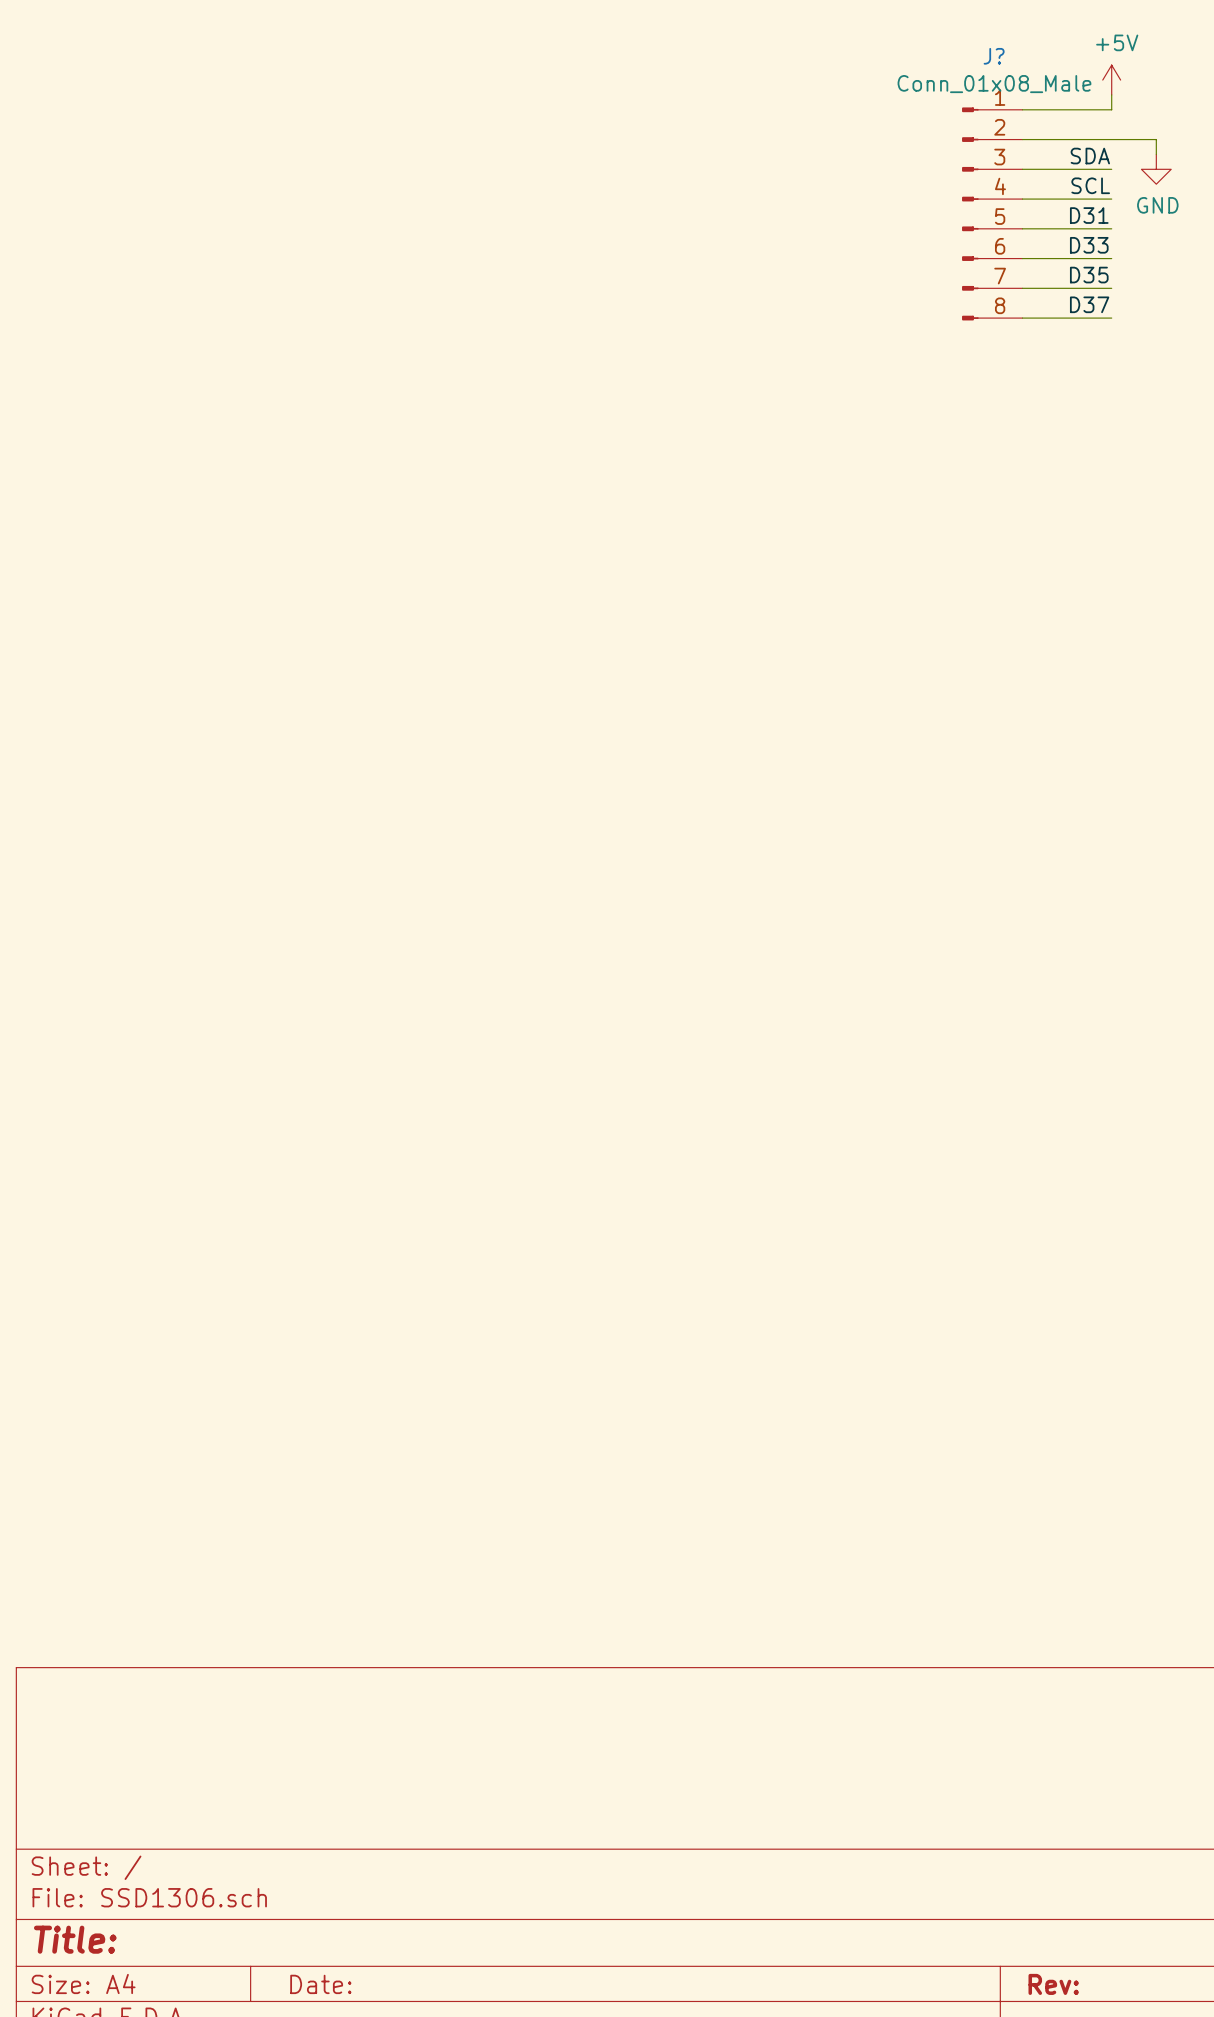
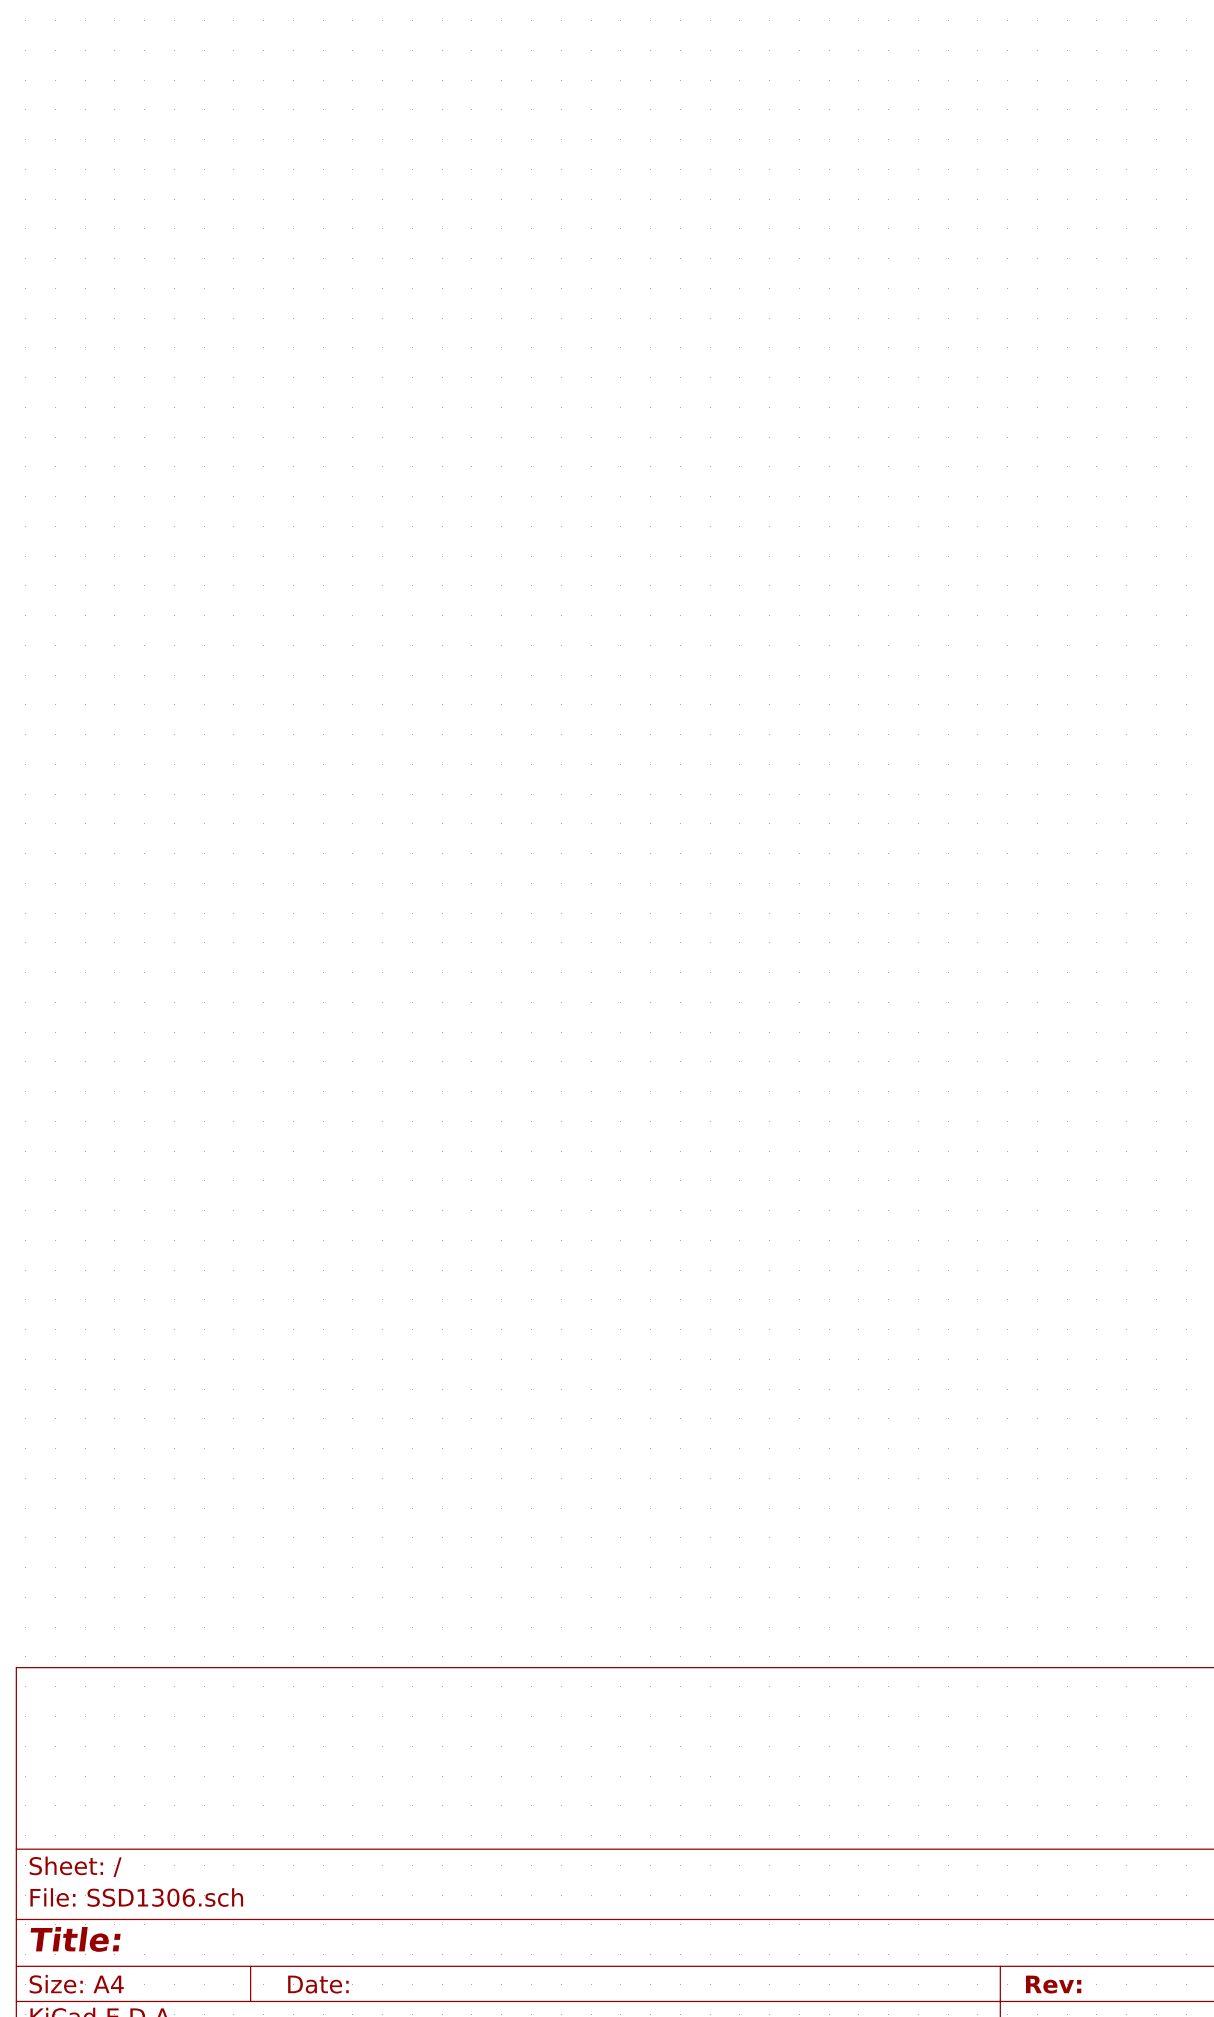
power symbol: +5V (1111, 80) -> none
wire: (1111, 94) (1111, 109) (1022, 109) -> none
wire: (1022, 139) (1156, 139) (1156, 154) -> none
label: SDA (1090, 156) -> none
wire: (1022, 169) (1111, 169) -> none
power symbol: GND (1156, 169) -> none
label: SCL (1090, 185) -> none
wire: (1022, 199) (1111, 199) -> none
J?: Conn_01x08_Male (992, 213) -> none
label: D31 (1089, 215) -> none
wire: (1022, 228) (1111, 228) -> none
label: D33 (1089, 245) -> none
wire: (1022, 258) (1111, 258) -> none
label: D35 (1089, 275) -> none
wire: (1022, 288) (1111, 288) -> none
label: D37 (1089, 304) -> none
wire: (1022, 318) (1111, 318) -> none

